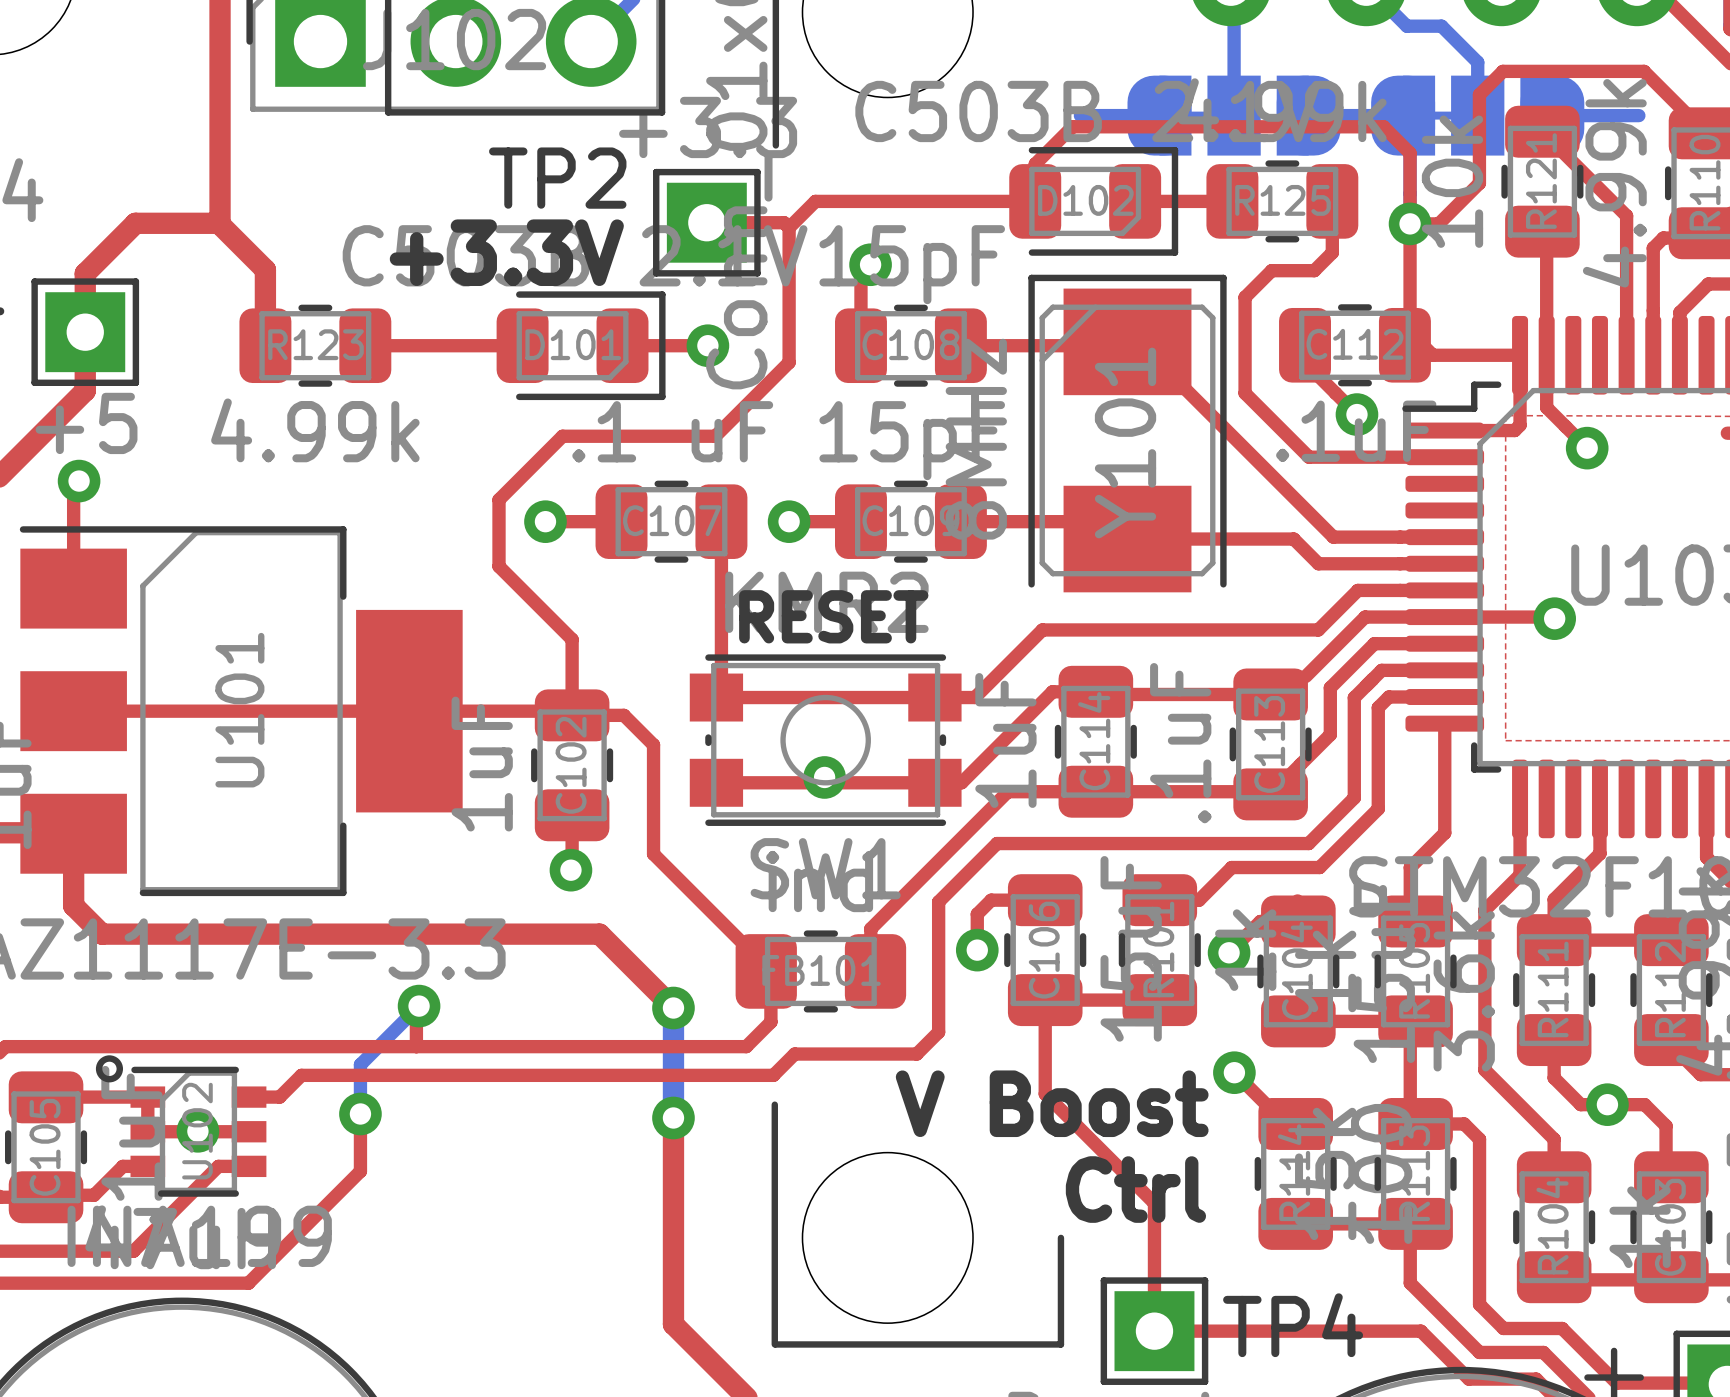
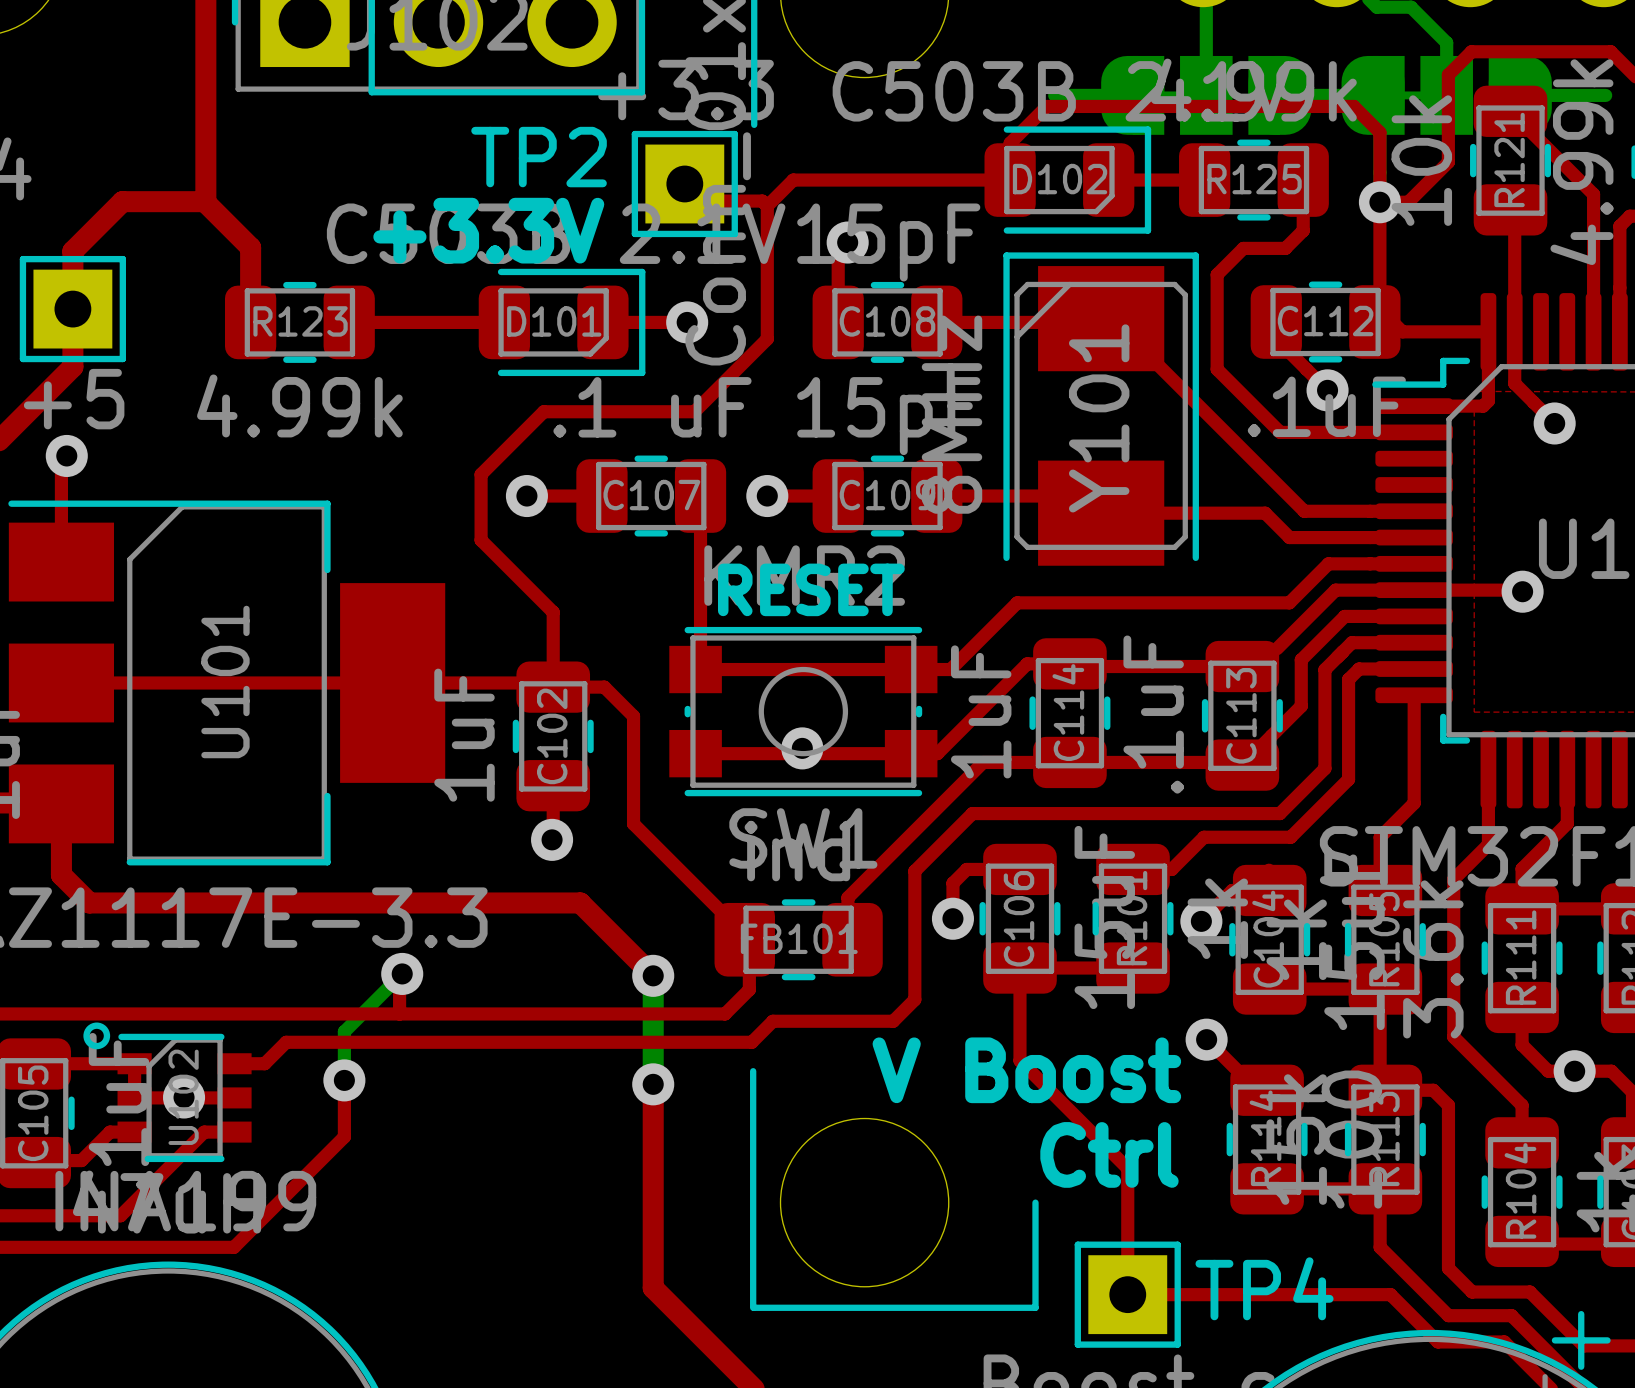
TP2 position: (706, 222) -> (684, 183)

